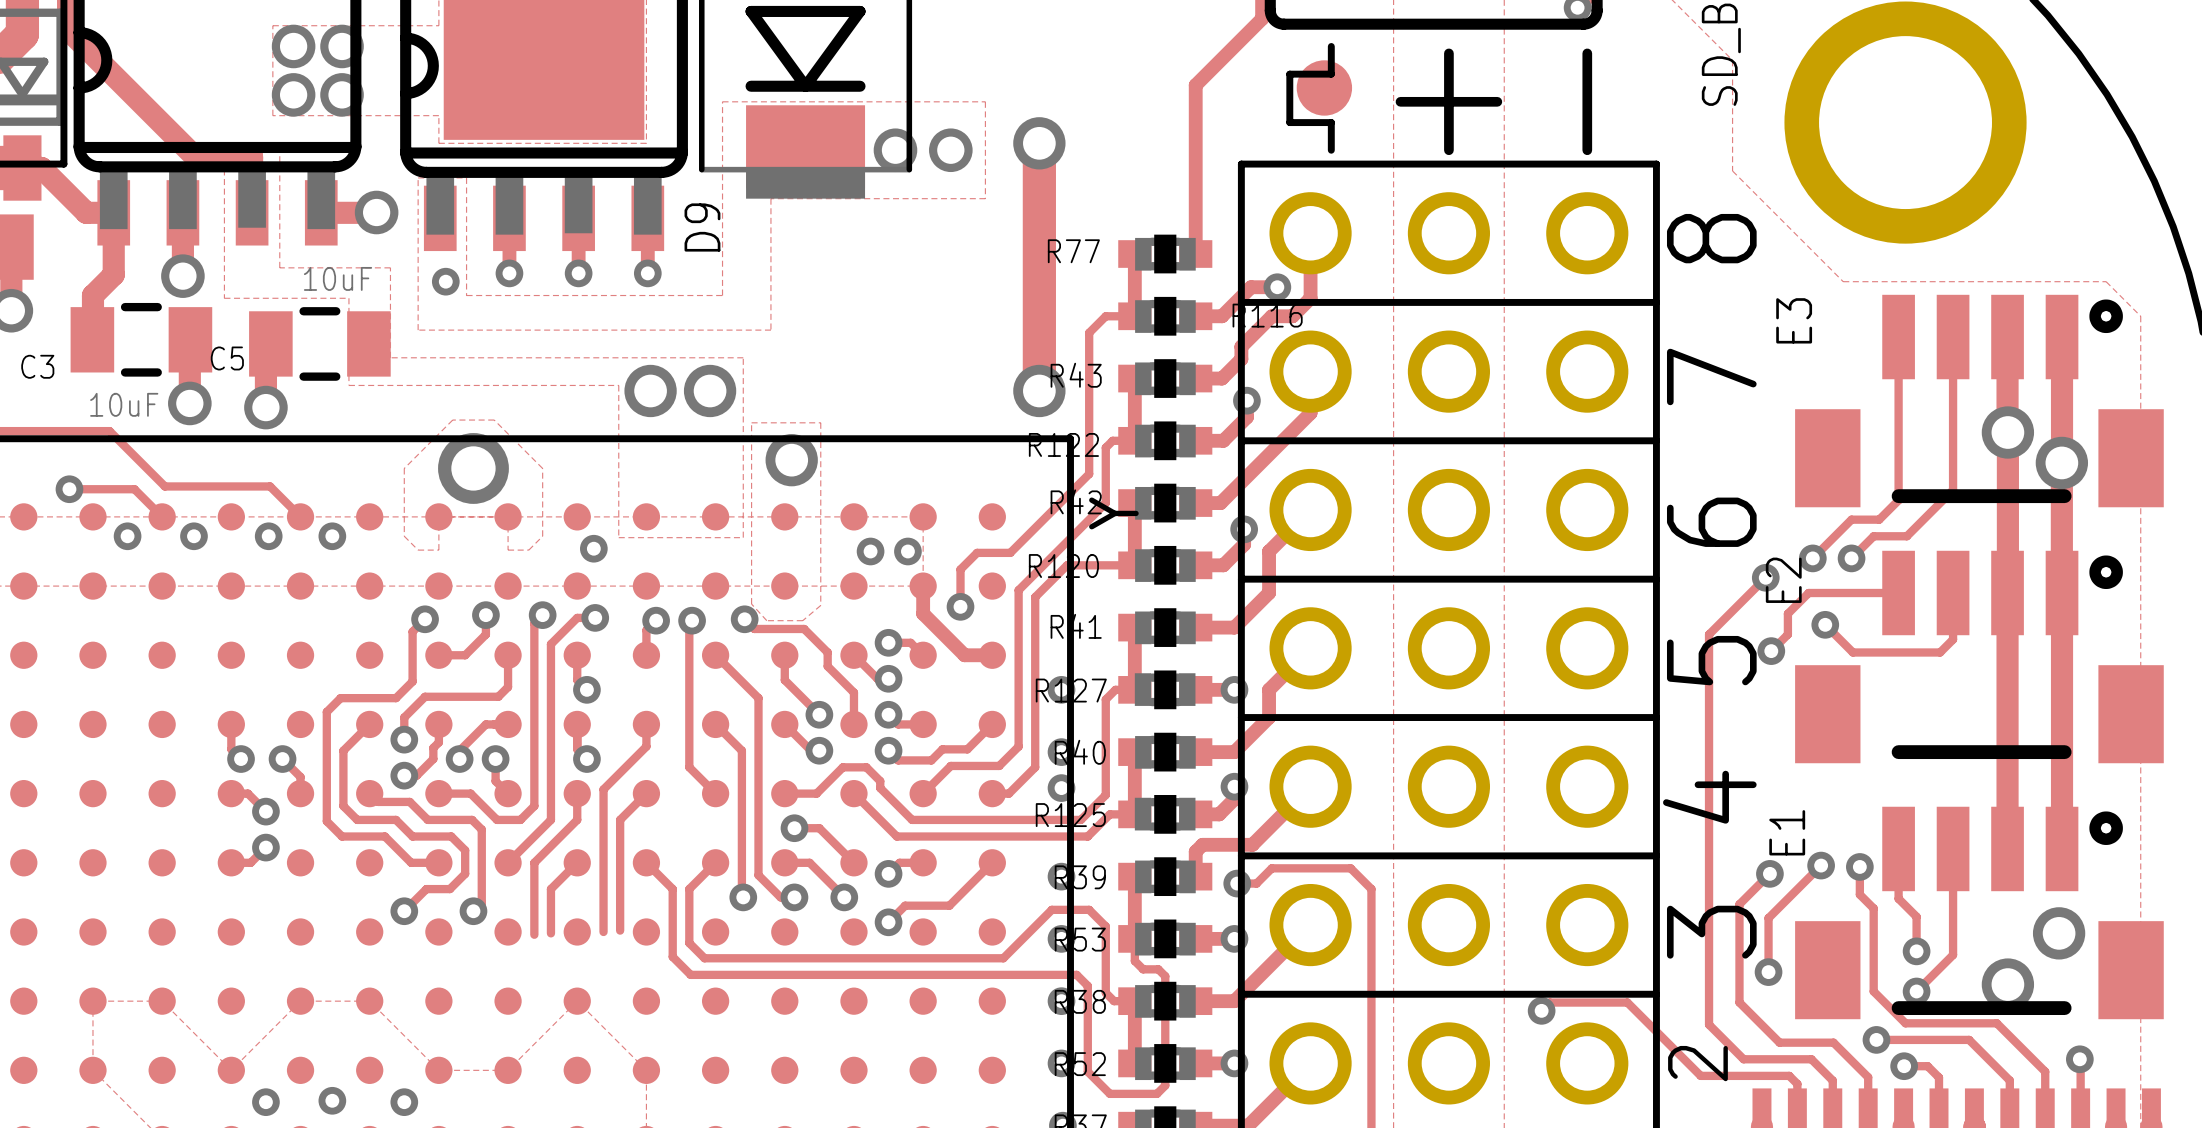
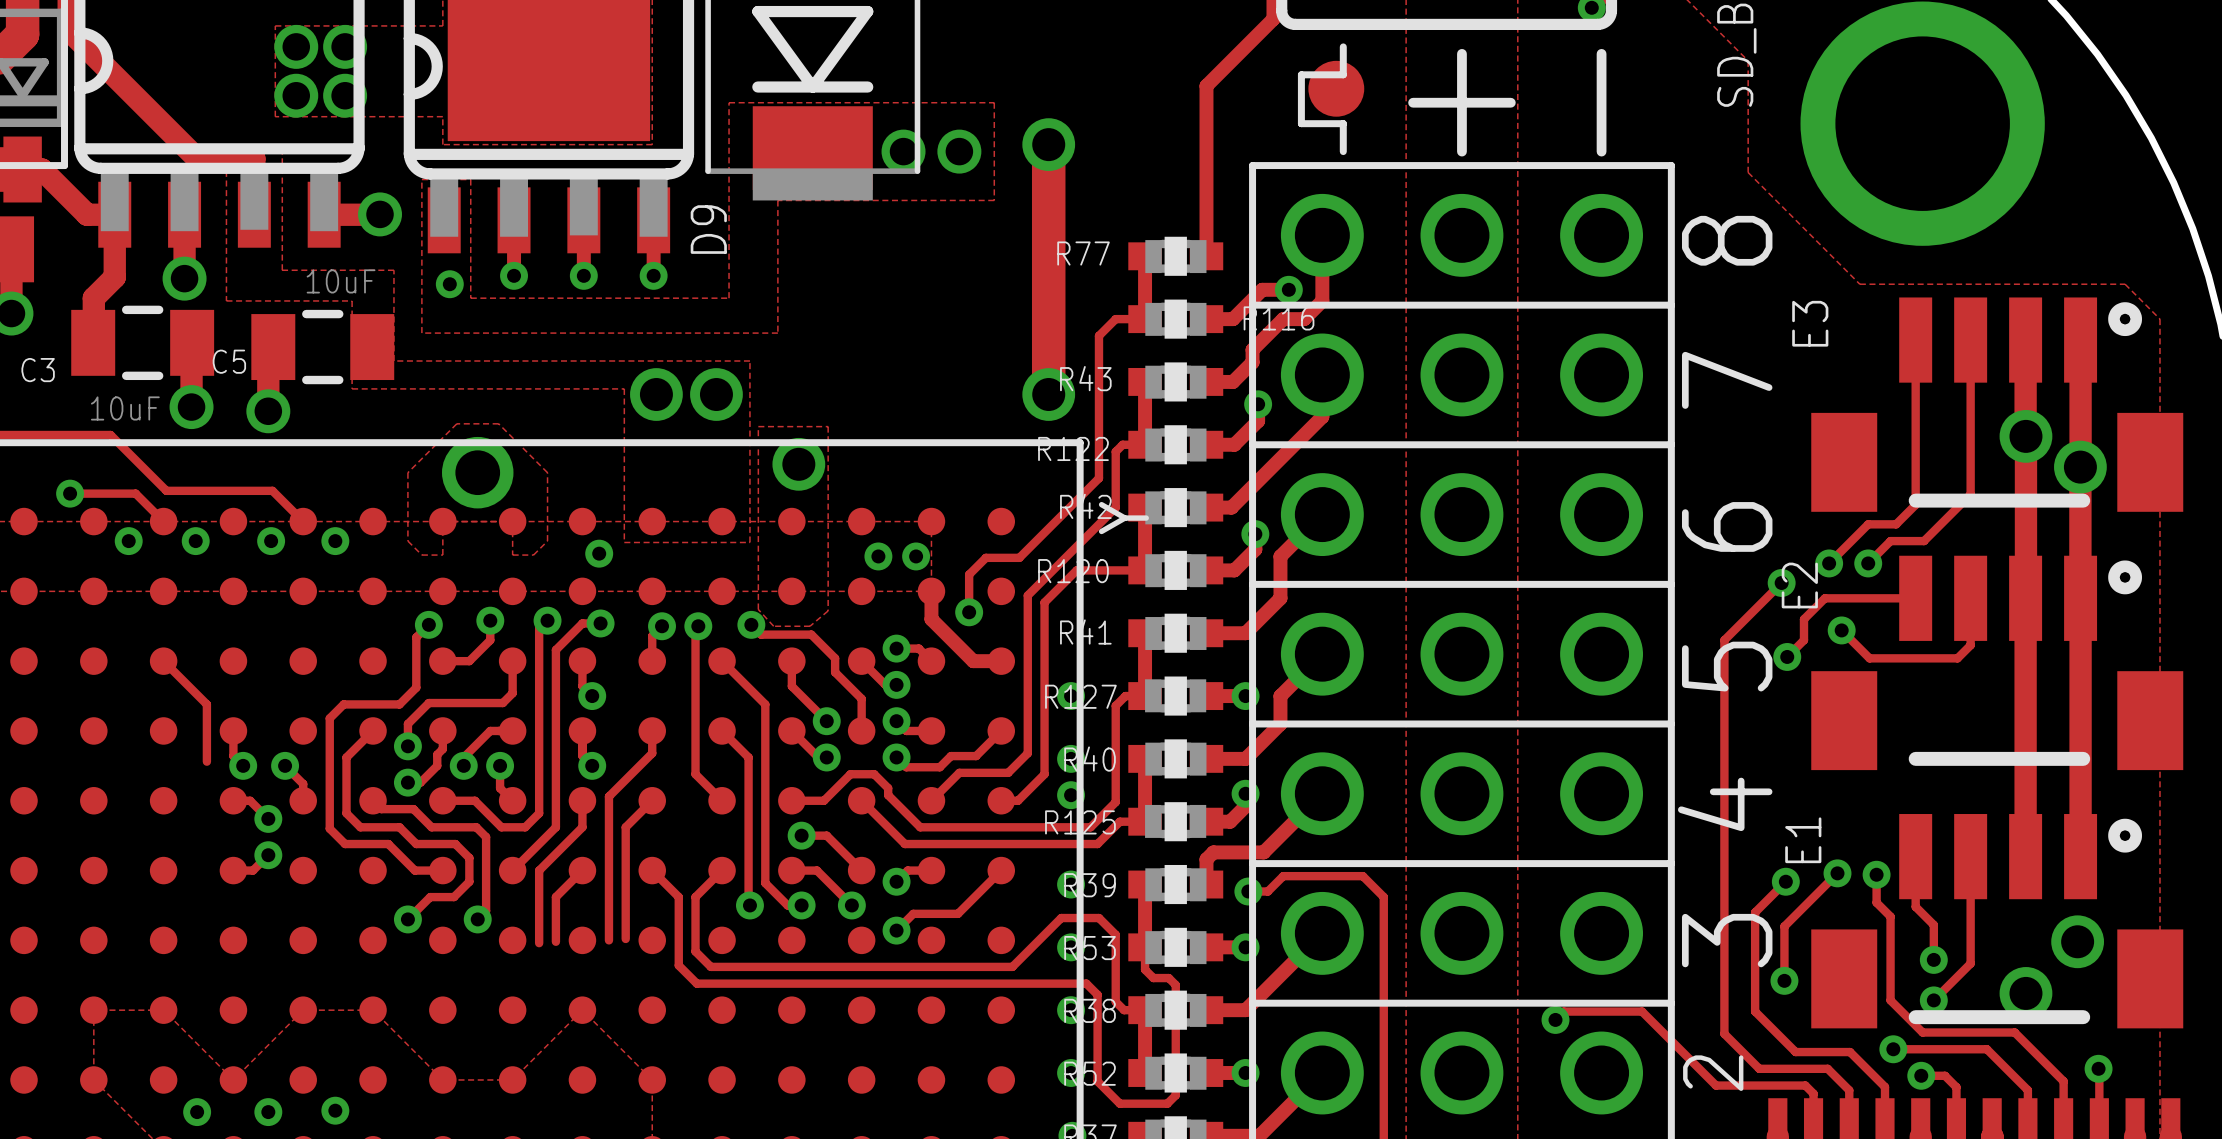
track: none -> (163, 661) (206, 704) (206, 761)
via: none -> (197, 1112)
via: (404, 1102) -> none

